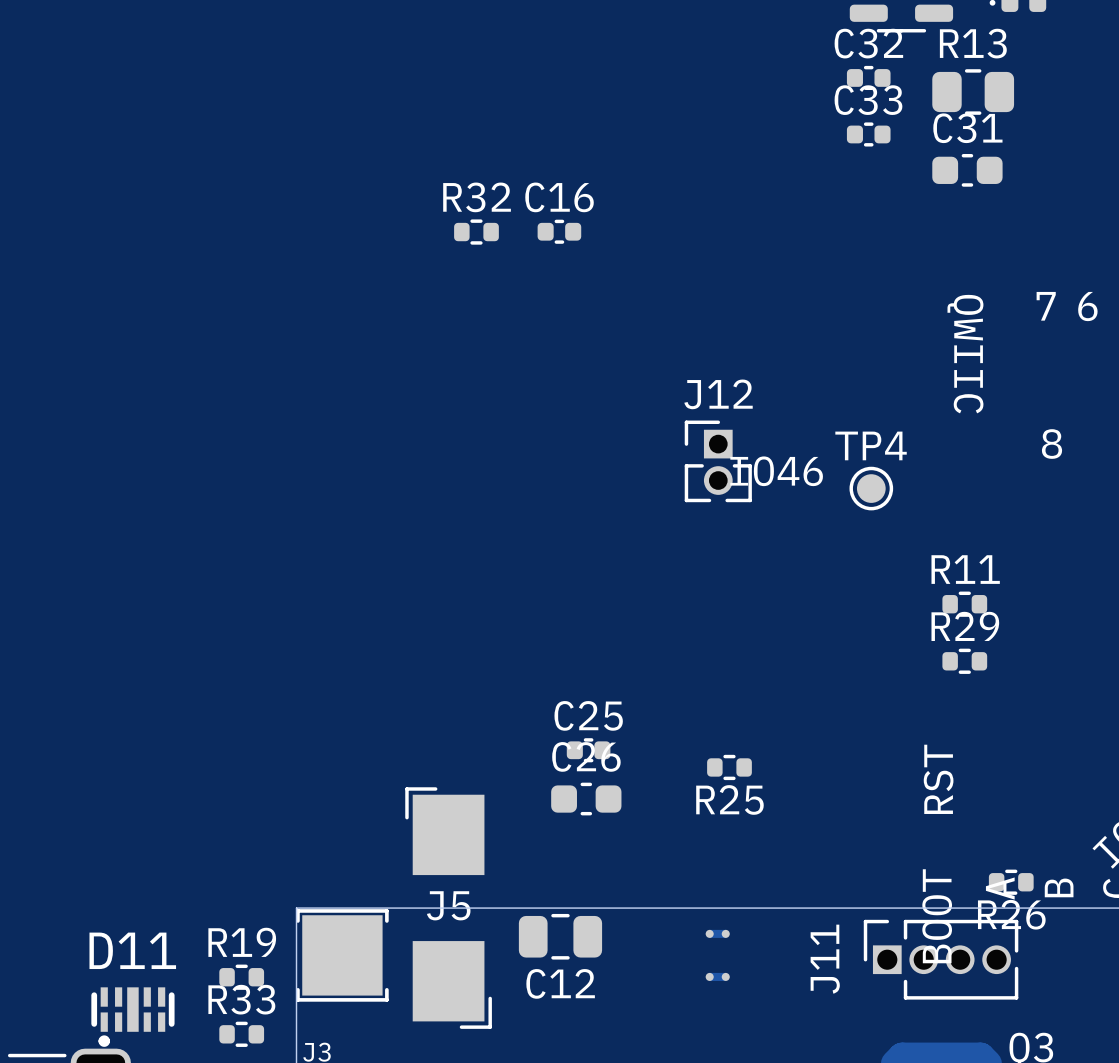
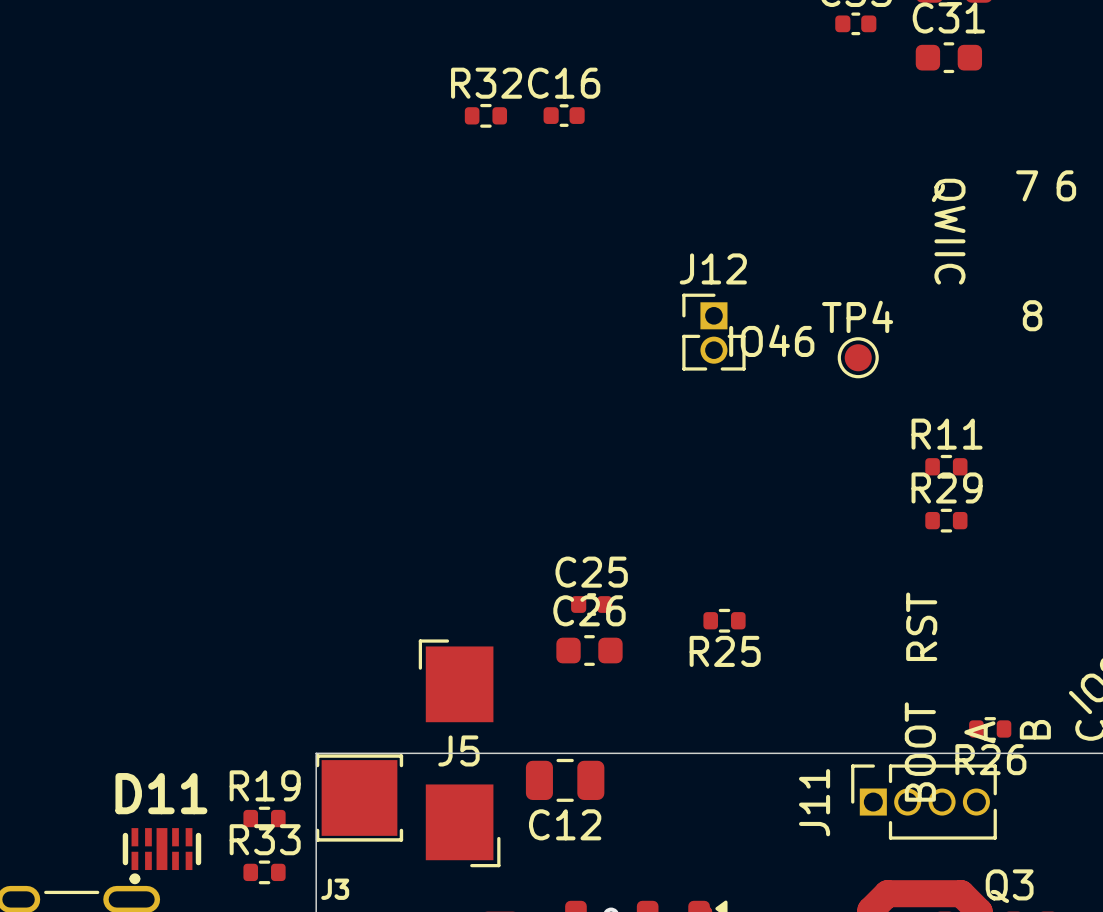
part: (717, 933) -> none
part: (717, 976) -> none

